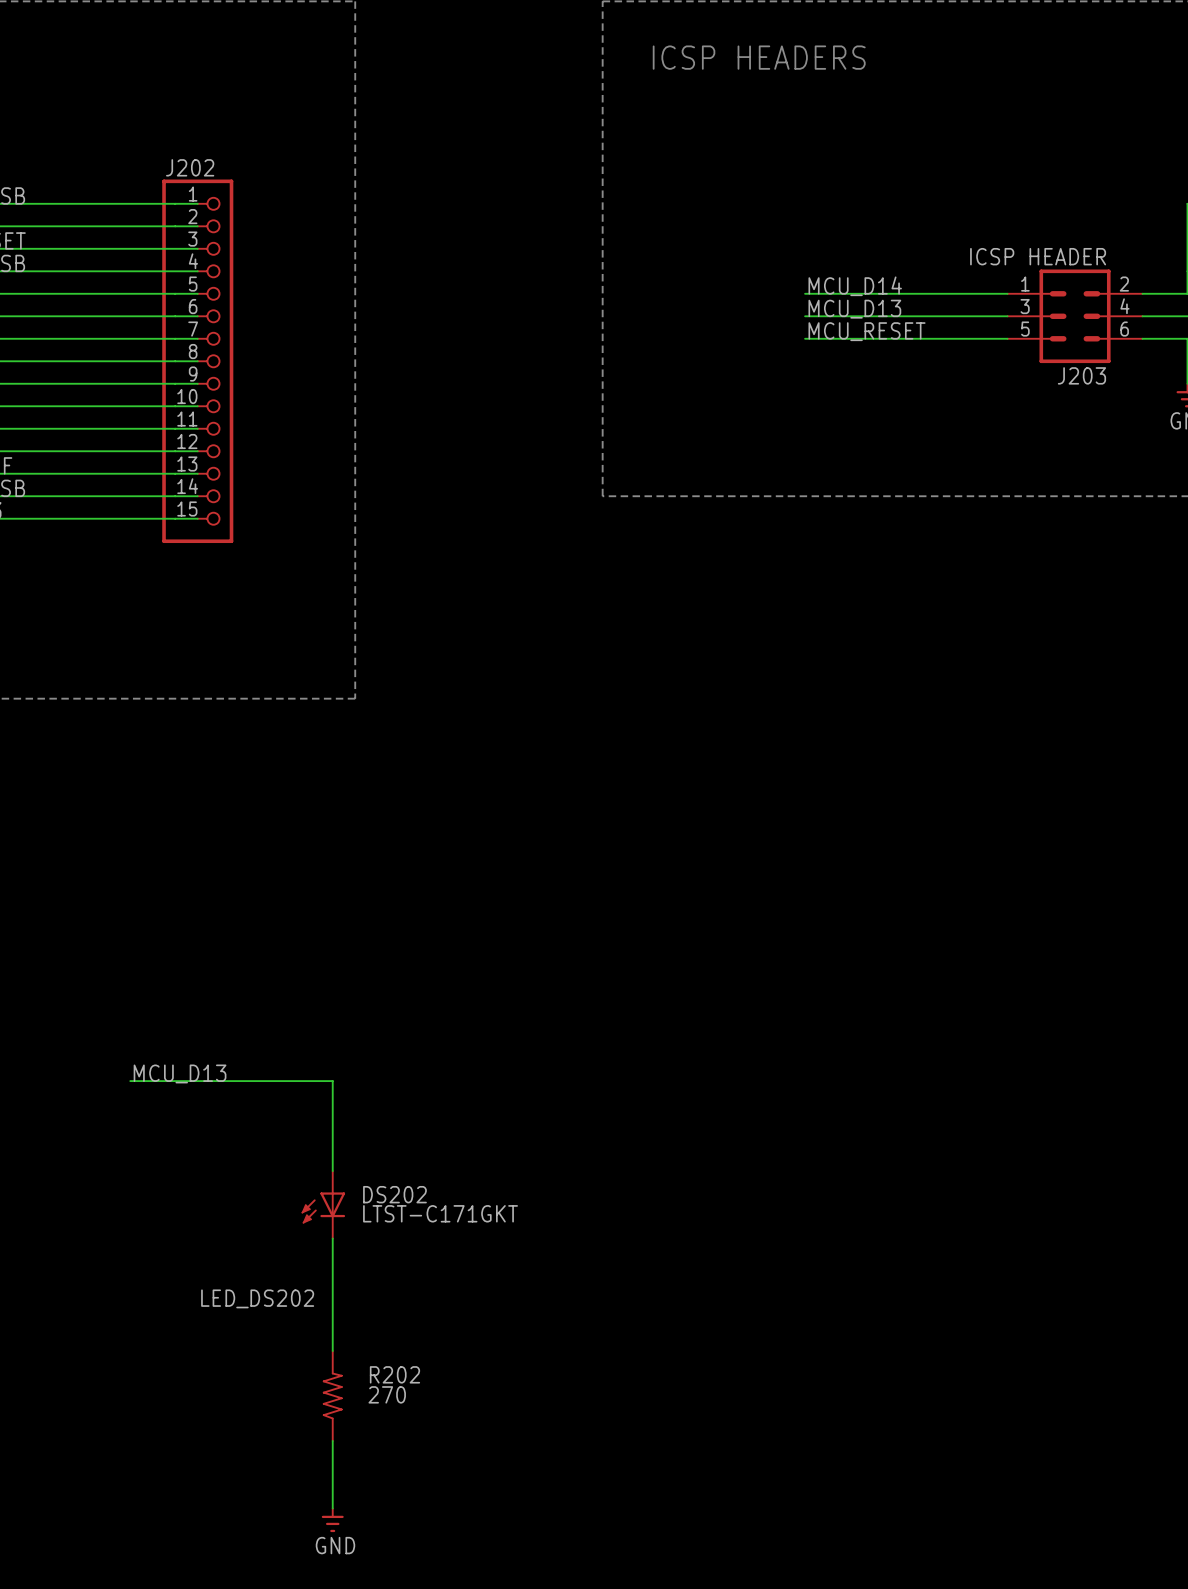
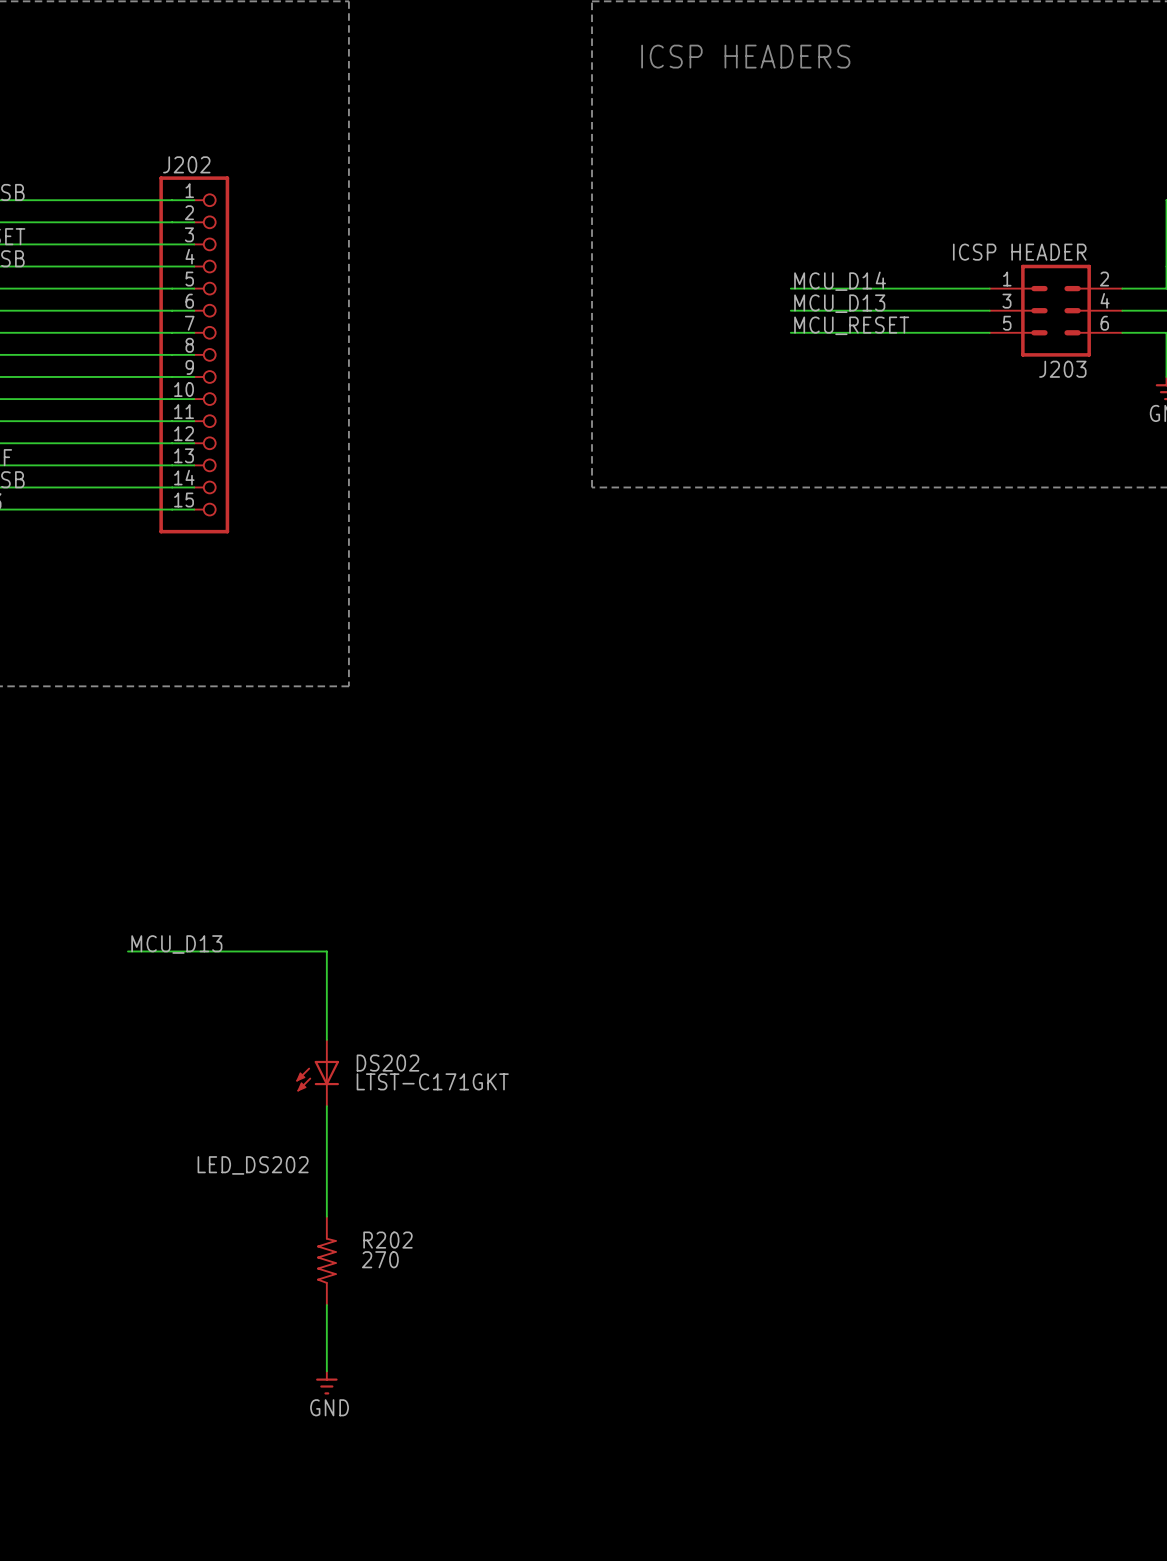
wire: none -> (127, 951) (326, 951) (326, 1039)
label position: MCU_D13 (180, 1073) -> MCU_D13 (176, 944)
wire: (130, 1081) (332, 1081) (332, 1126) -> none
DS202 position: (323, 1204) -> (317, 1073)
label position: LED_DS202 (257, 1298) -> LED_DS202 (253, 1165)
R202 position: (332, 1395) -> (326, 1260)
wire: (332, 1440) (332, 1508) -> none
power symbol position: GND (332, 1519) -> GND (326, 1382)

